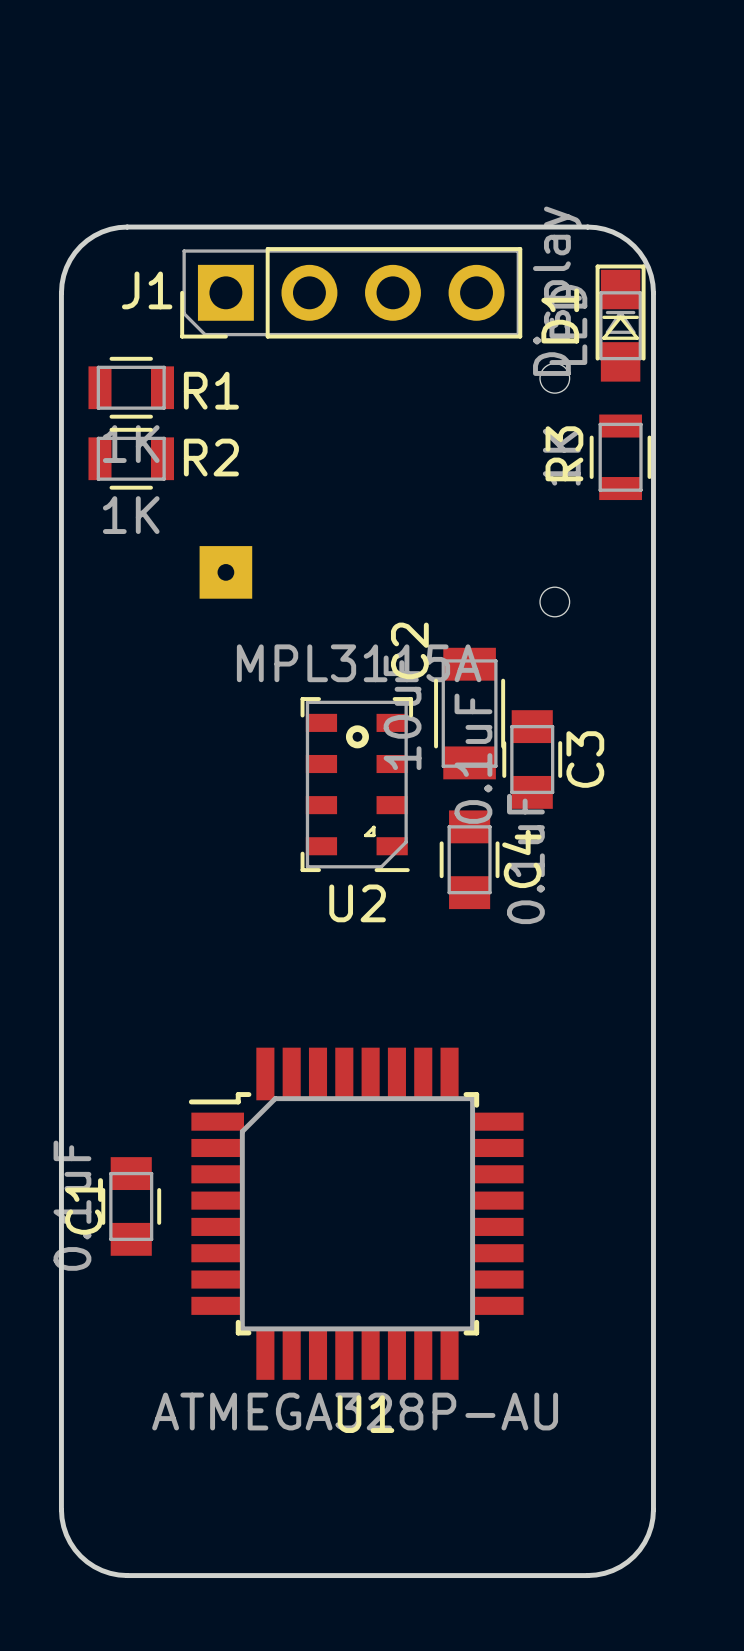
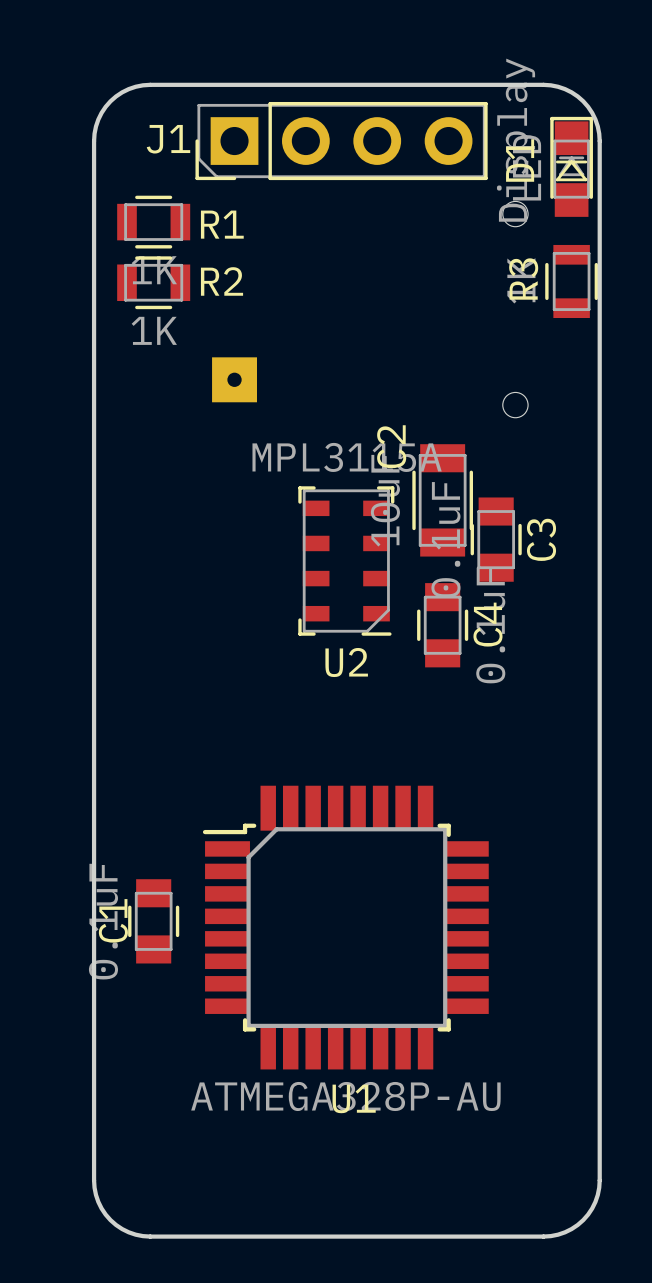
drawing: [345, 725, 369, 749] -> none
line: (373, 827) (373, 835) (365, 835) (373, 827) -> none

